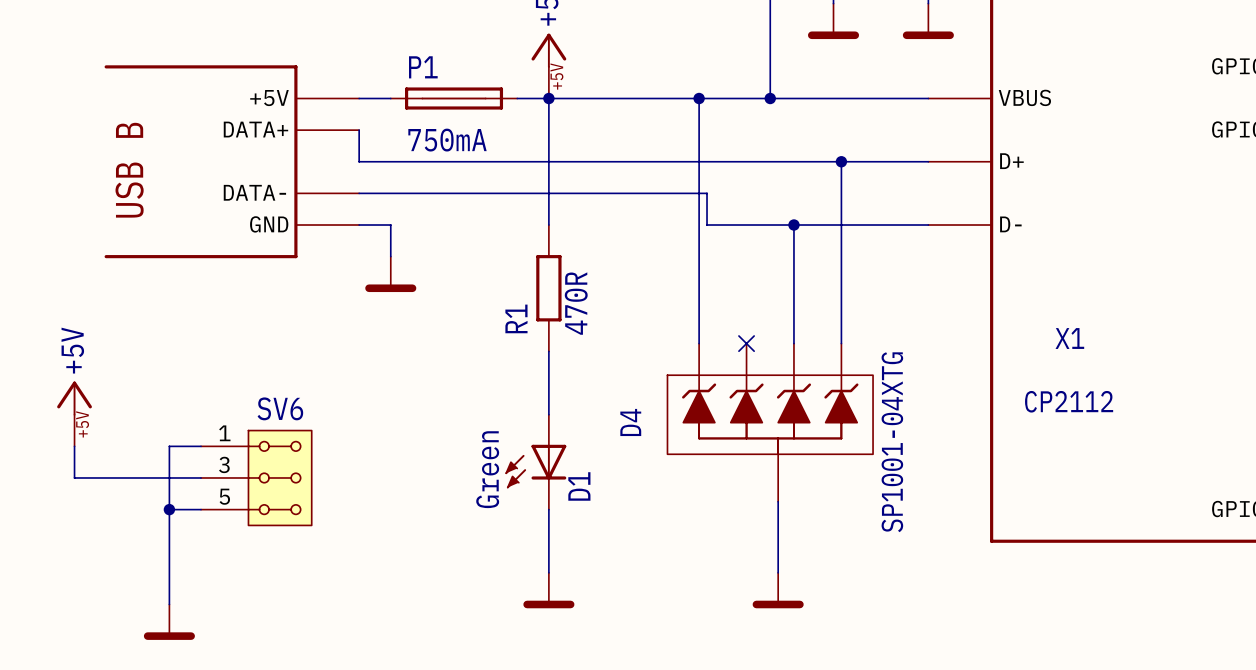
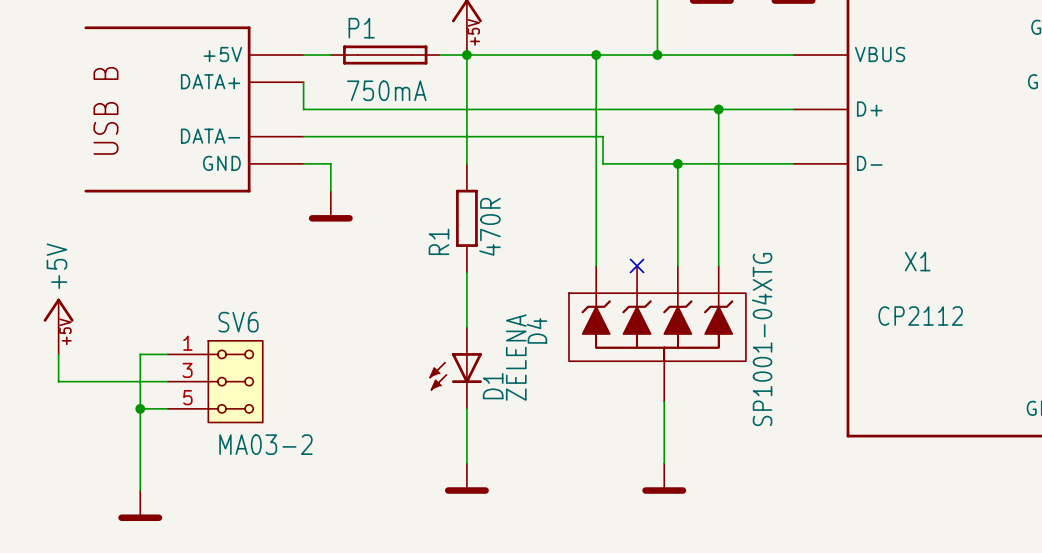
D1 value: Green (487, 469) -> ZELENA (516, 357)
SV6 value: none -> MA03-2 (265, 444)

